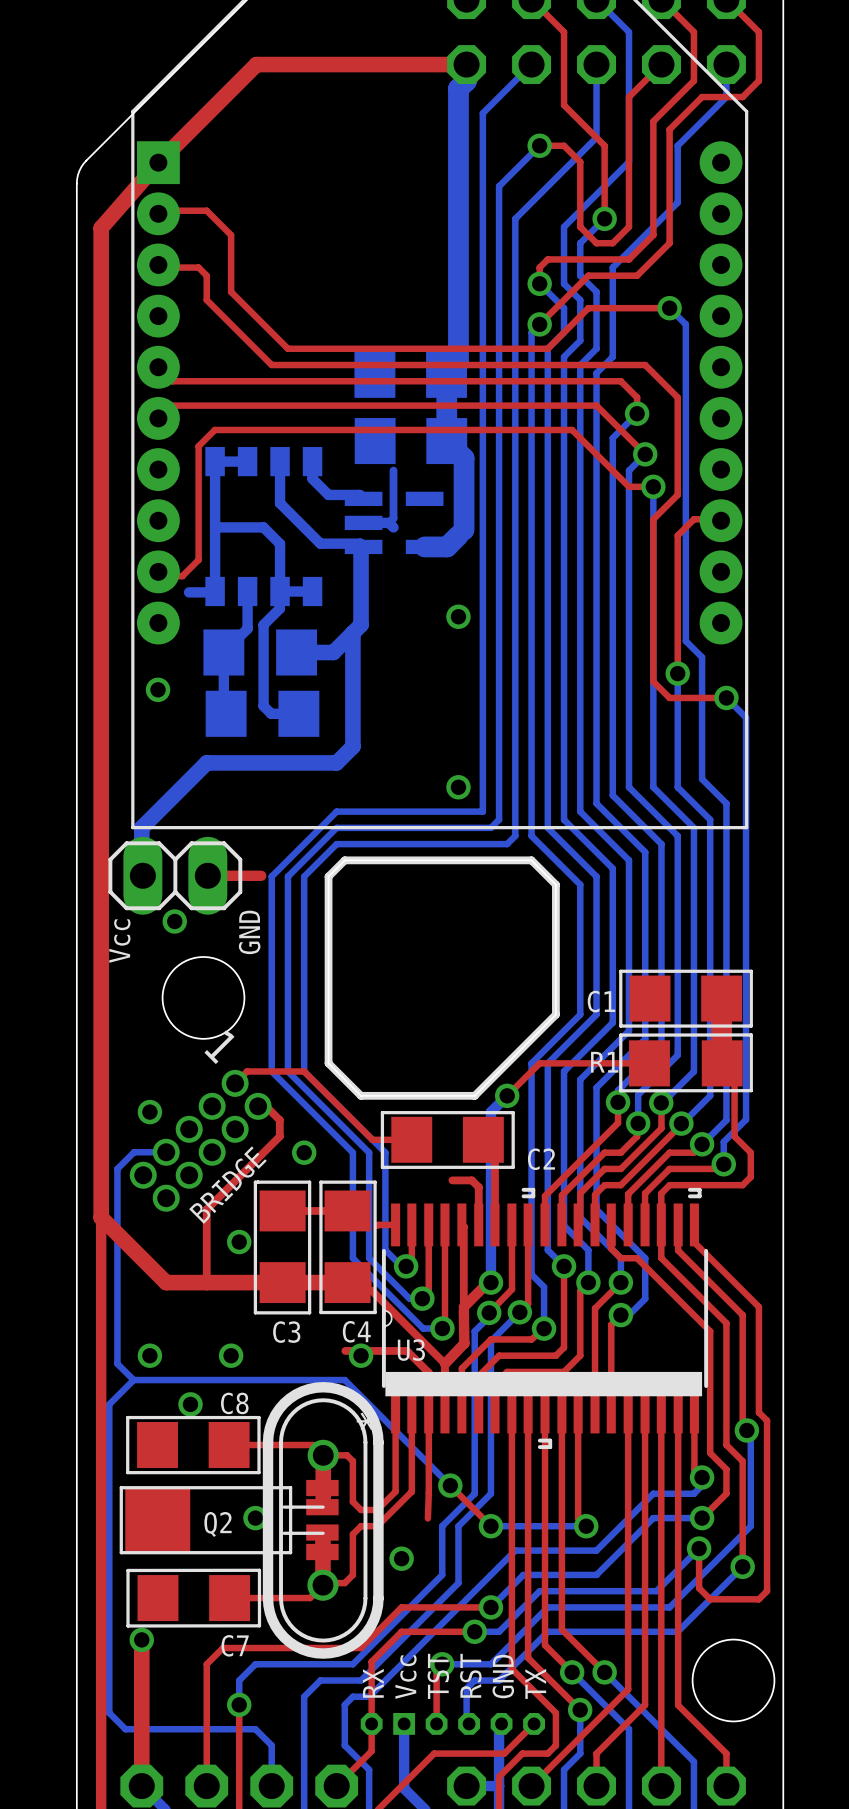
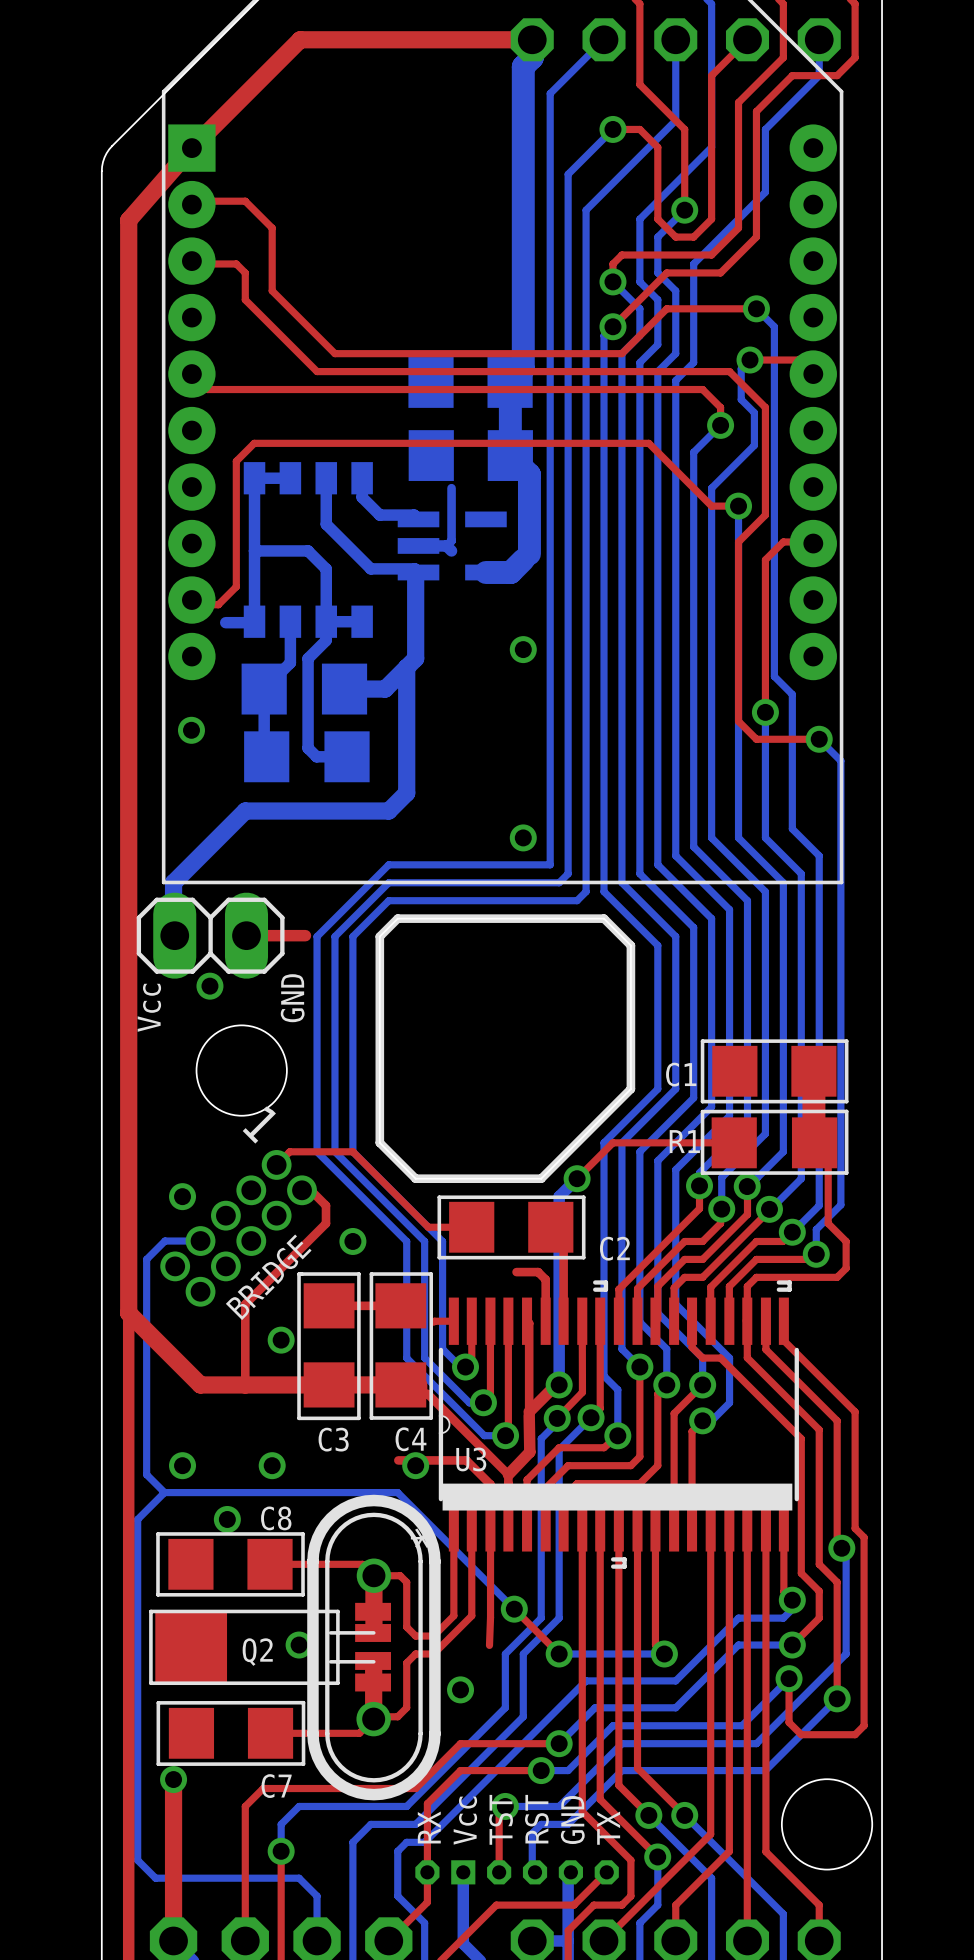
bottom track: none -> (750, 360) (741, 368) (741, 399) (754, 412) (754, 445) (729, 470)
top track: none -> (750, 360) (798, 360) (813, 374)
top track: (158, 418) (171, 405) (596, 405) (645, 454) -> none
via position: (645, 454) -> (750, 360)

